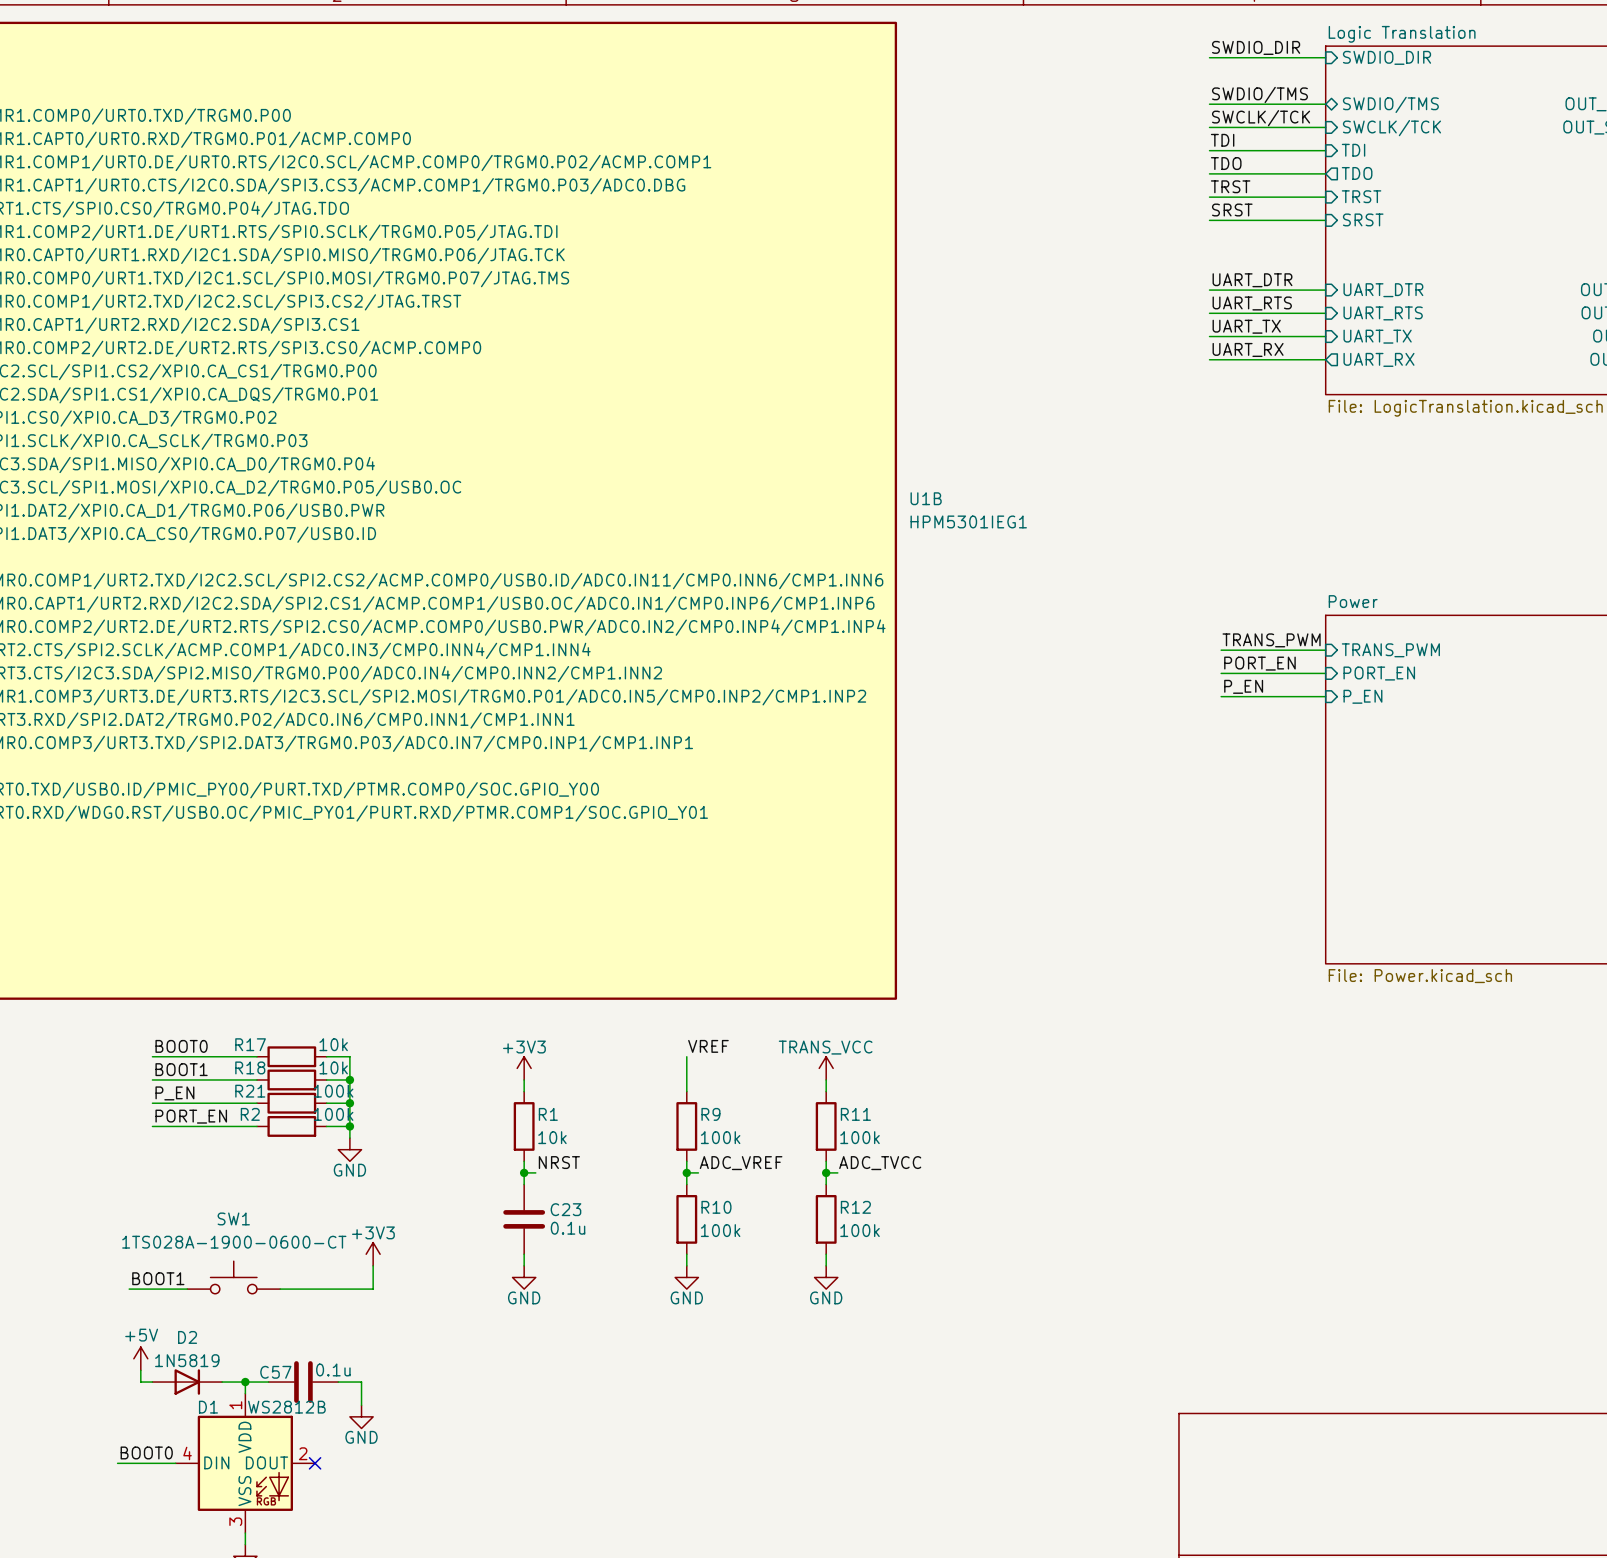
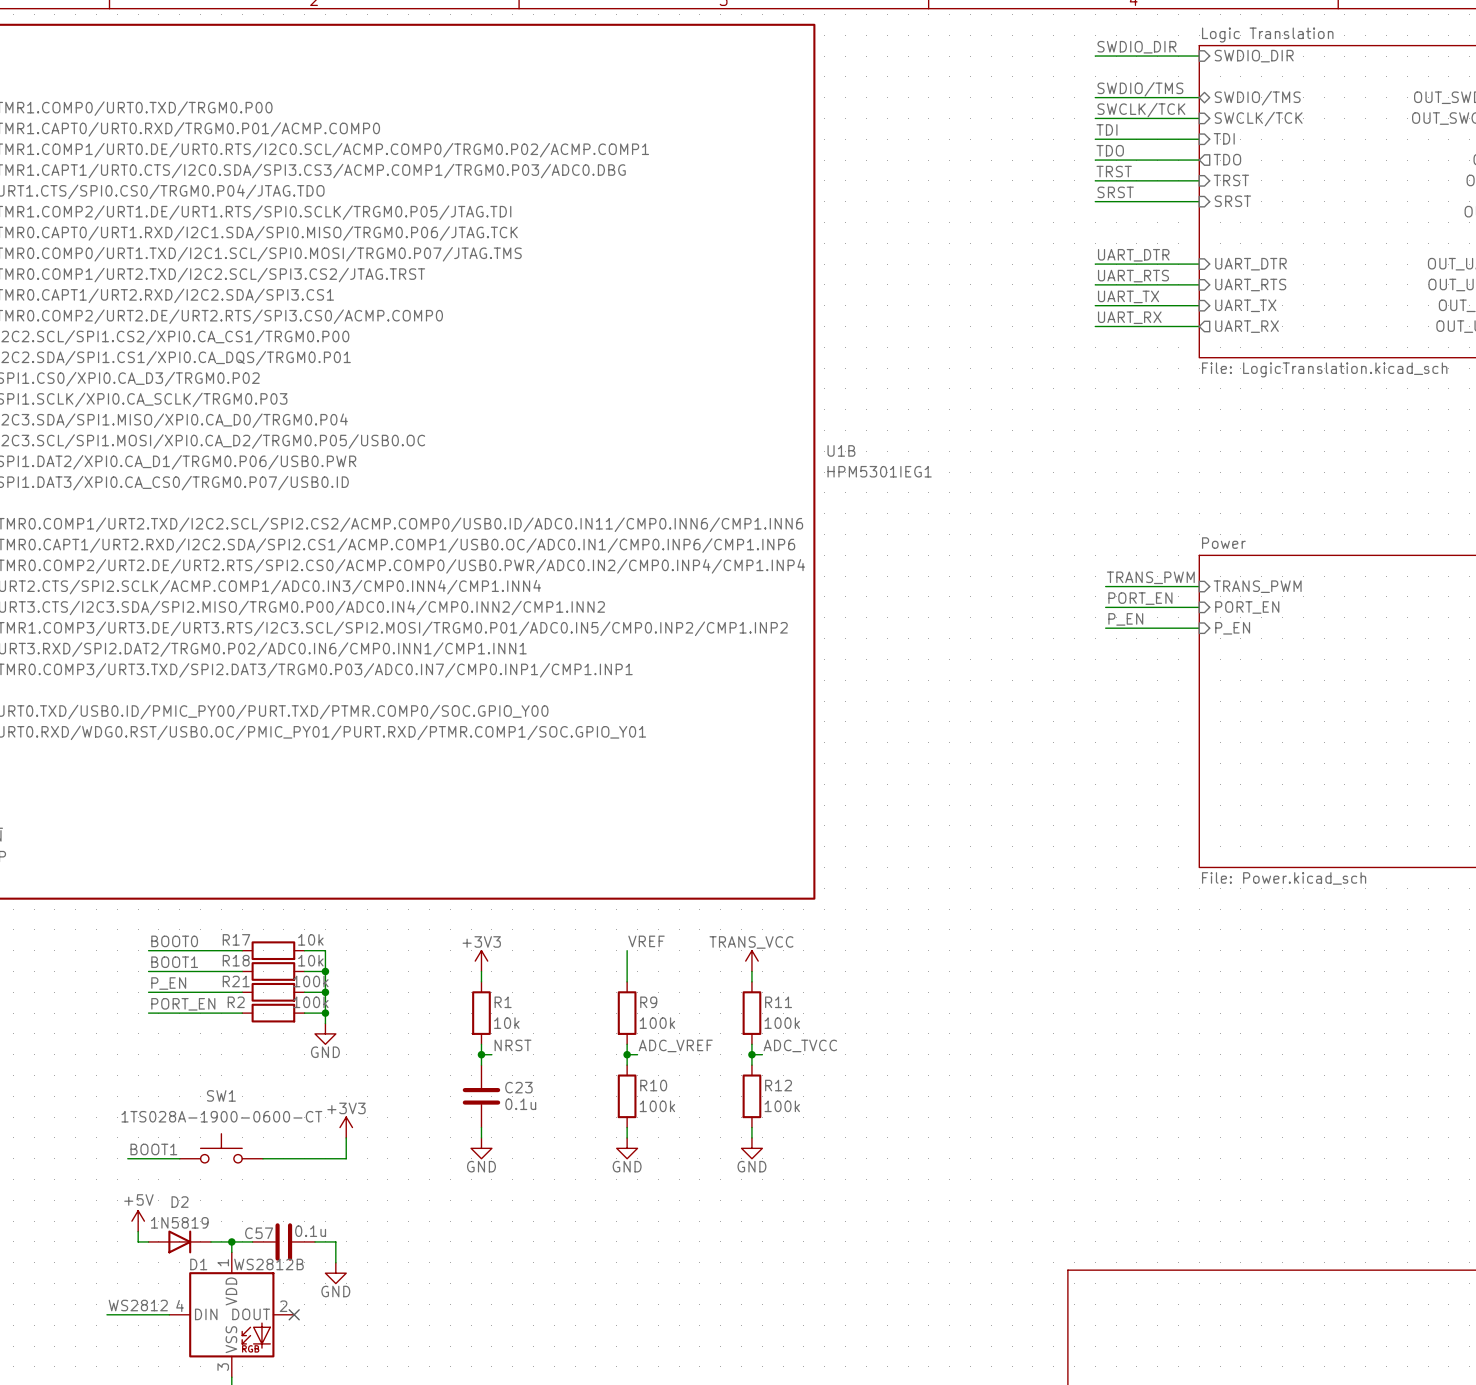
label: none -> WS2812 (138, 1305)
label: BOOT0 (146, 1452) -> none
wire: none -> (106, 1314) (117, 1314)

